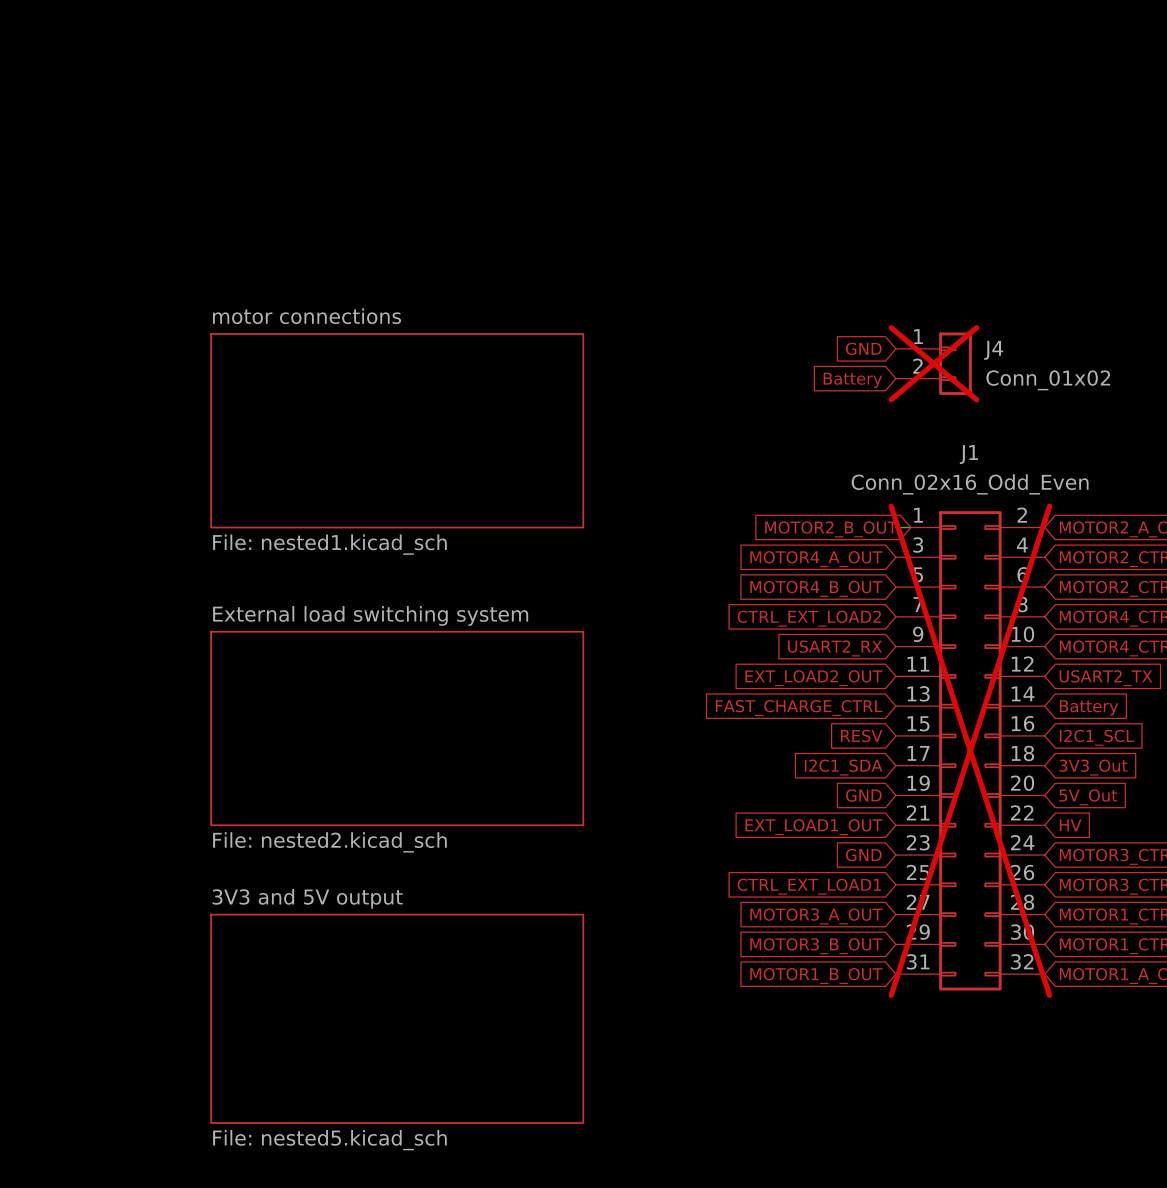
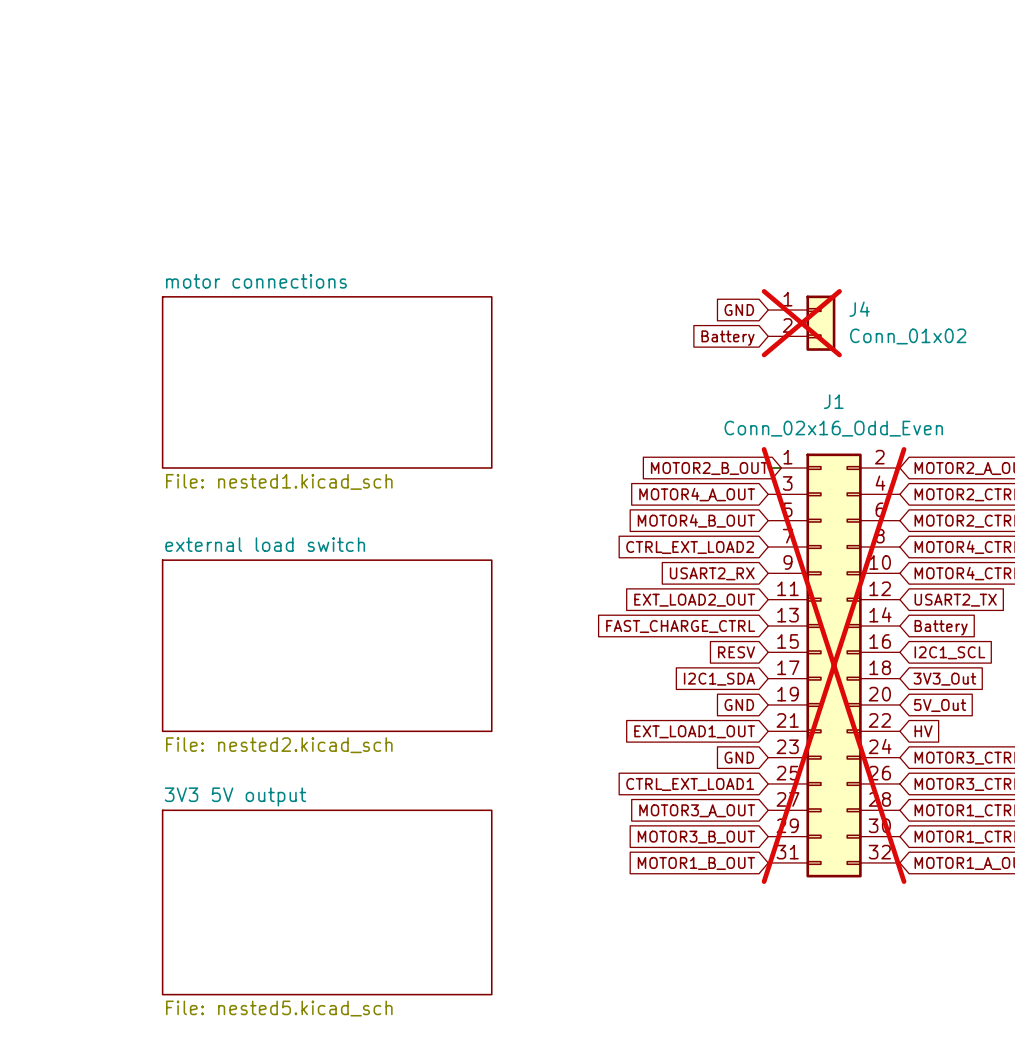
sheet External load switching system name: External load switching system (370, 615) -> external load switch (265, 544)
sheet 3V3 and 5V output name: 3V3 and 5V output (307, 898) -> 3V3 5V output (235, 796)

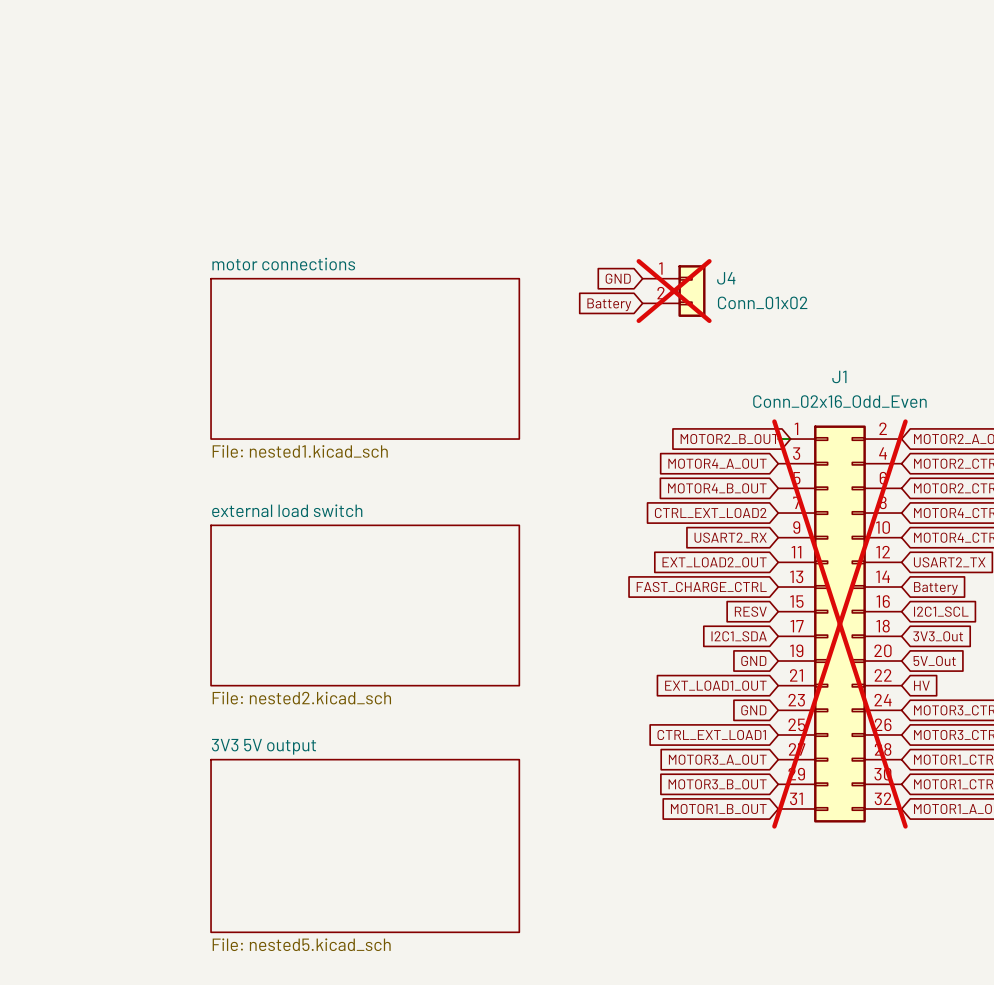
global label position: GND (739, 310) -> GND (618, 278)
J4 position: (801, 323) -> (674, 291)
global label position: Battery (728, 338) -> Battery (609, 304)

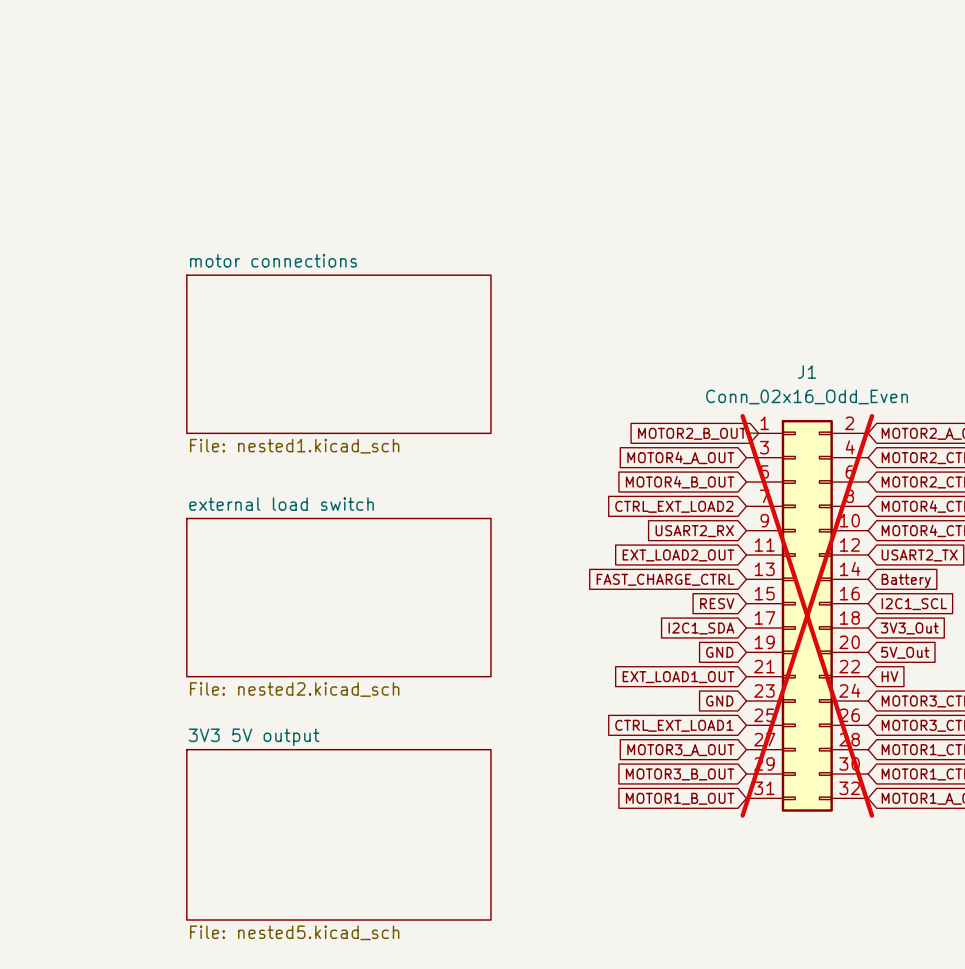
global label: GND (618, 278) -> none
J4: Conn_01x02 (674, 291) -> none
global label: Battery (609, 304) -> none

